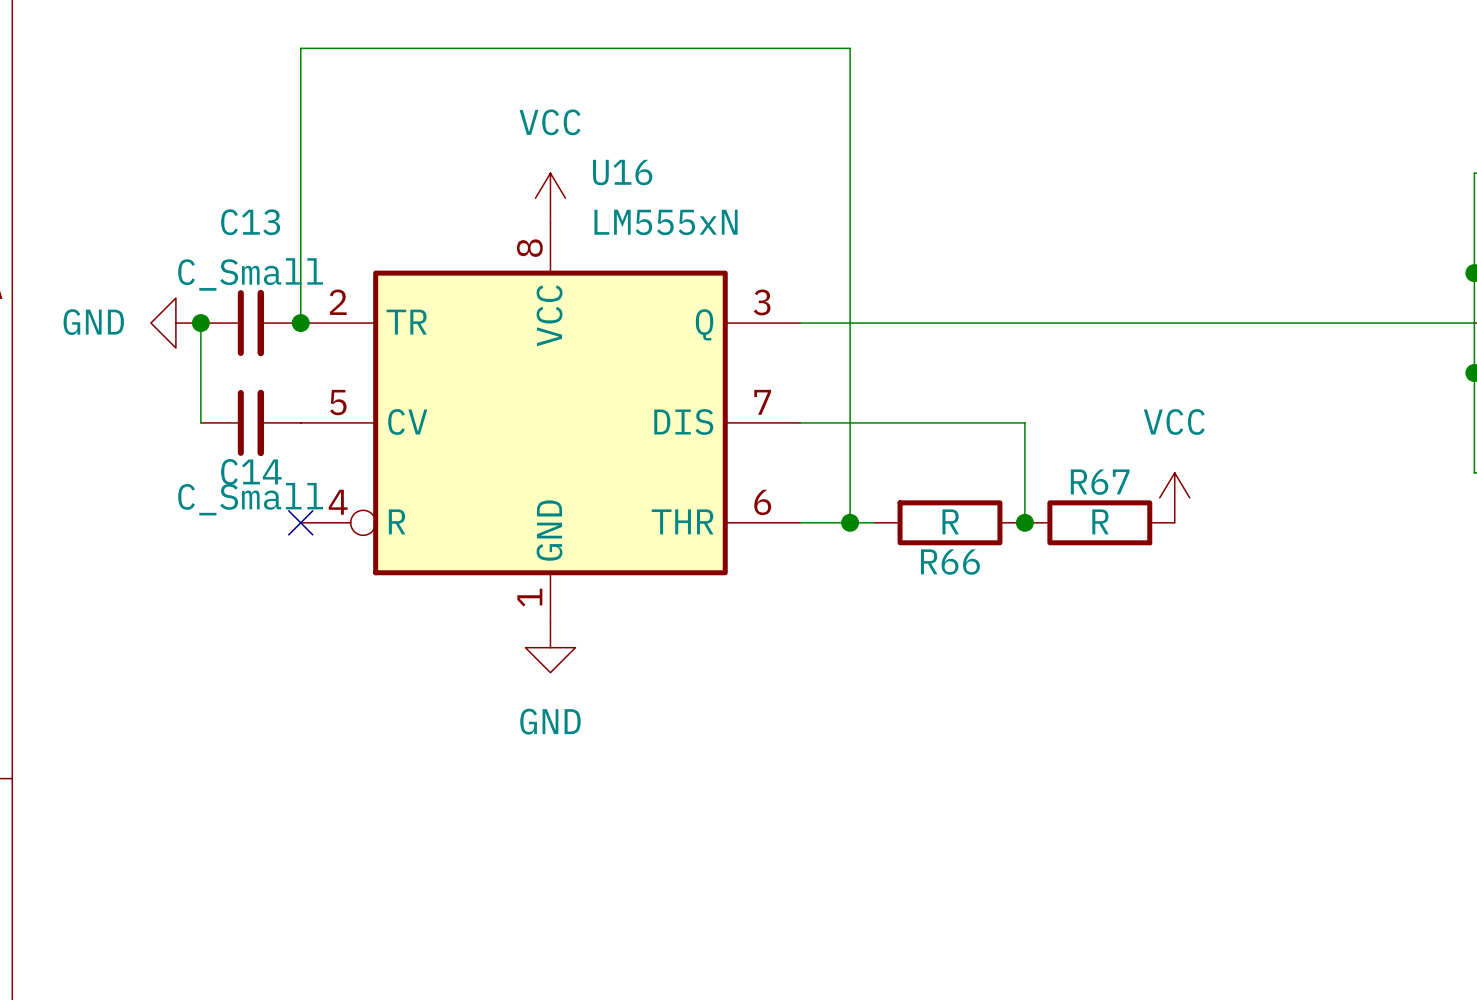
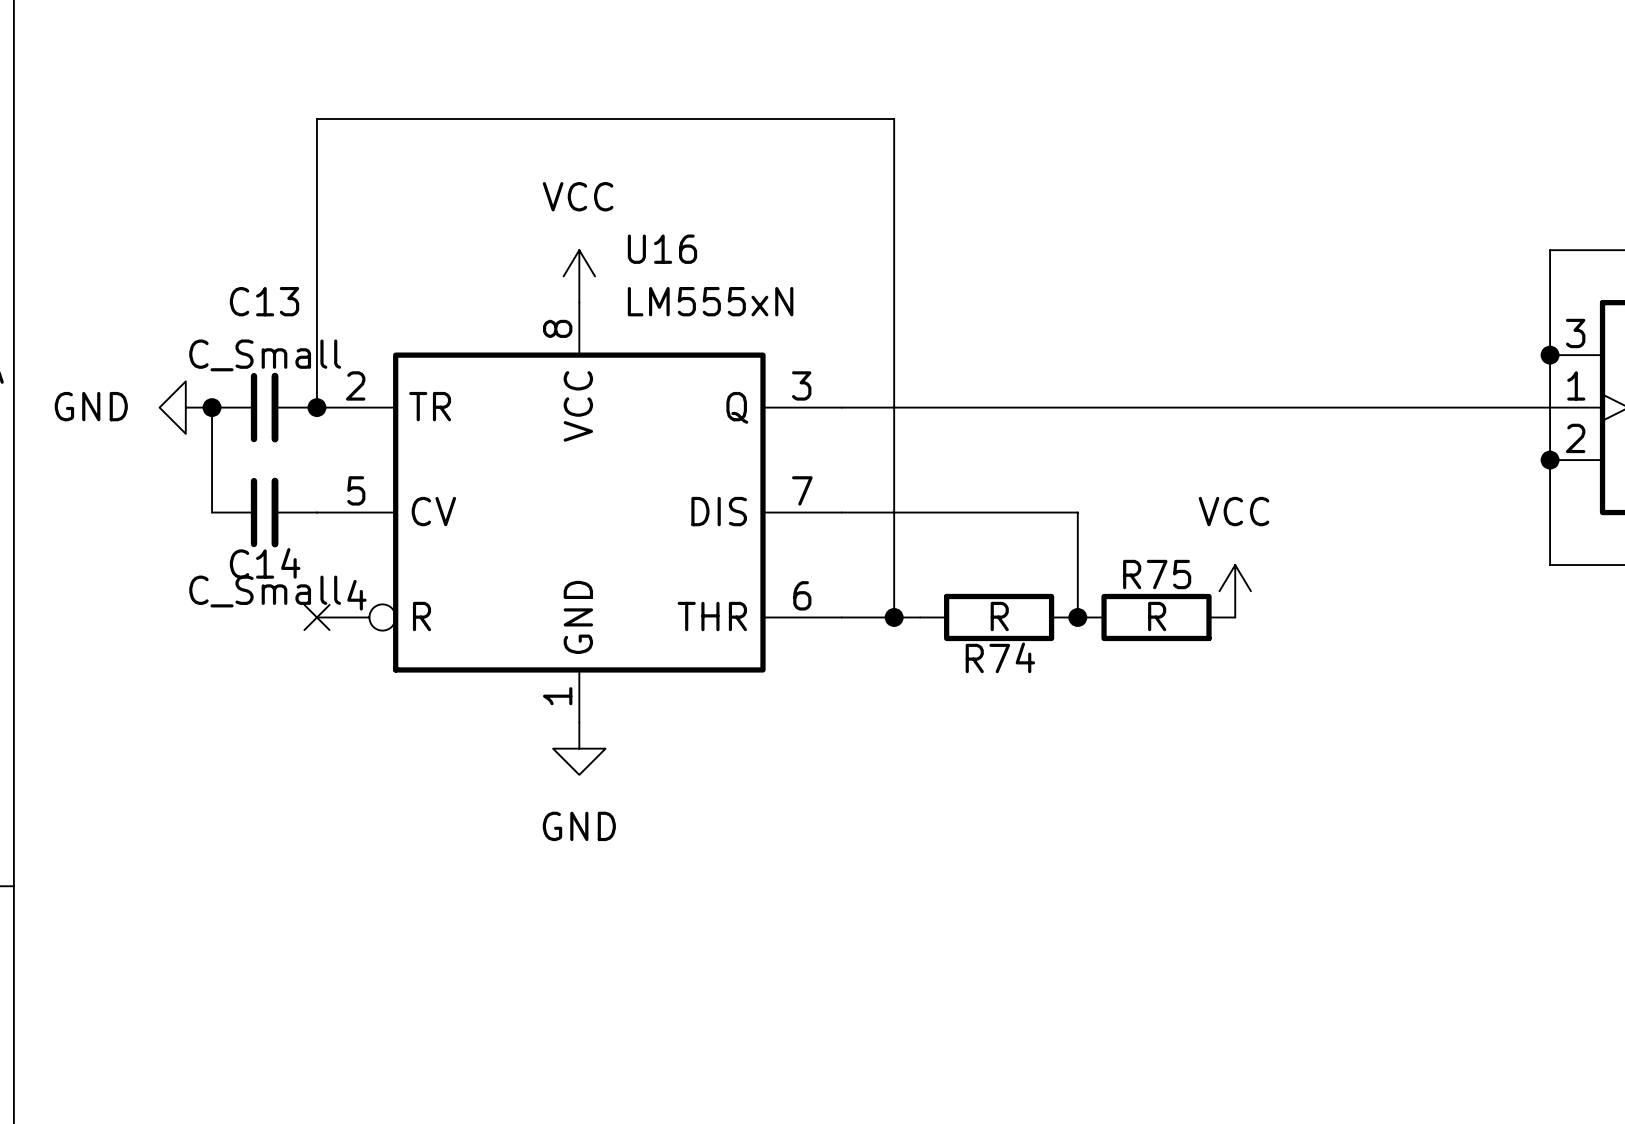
R67 name: R67 (1100, 482) -> R75 (1157, 574)
R66 name: R66 (950, 562) -> R74 (1000, 657)

